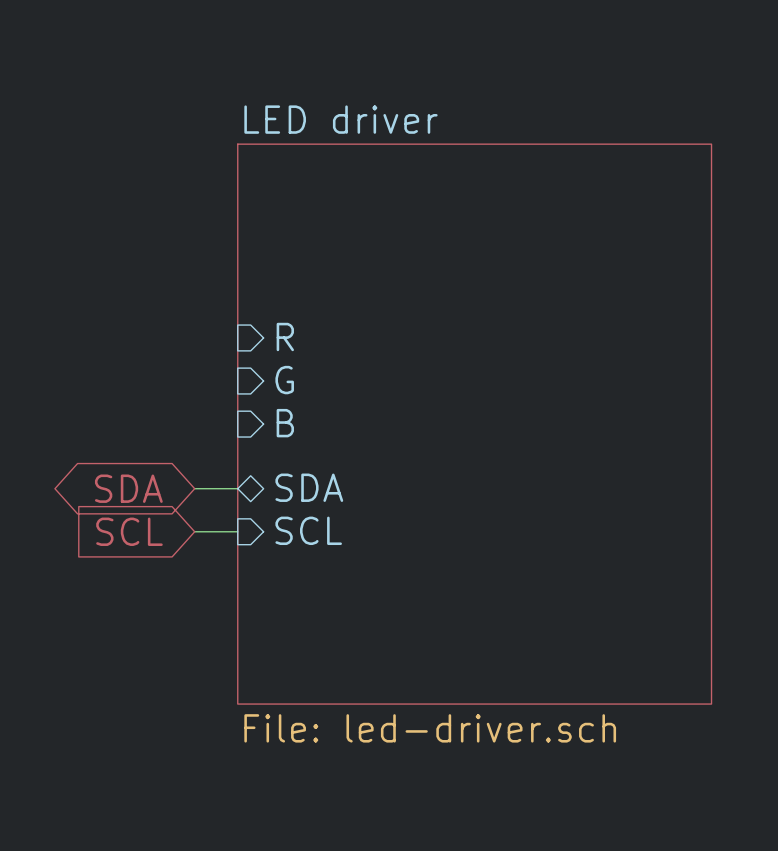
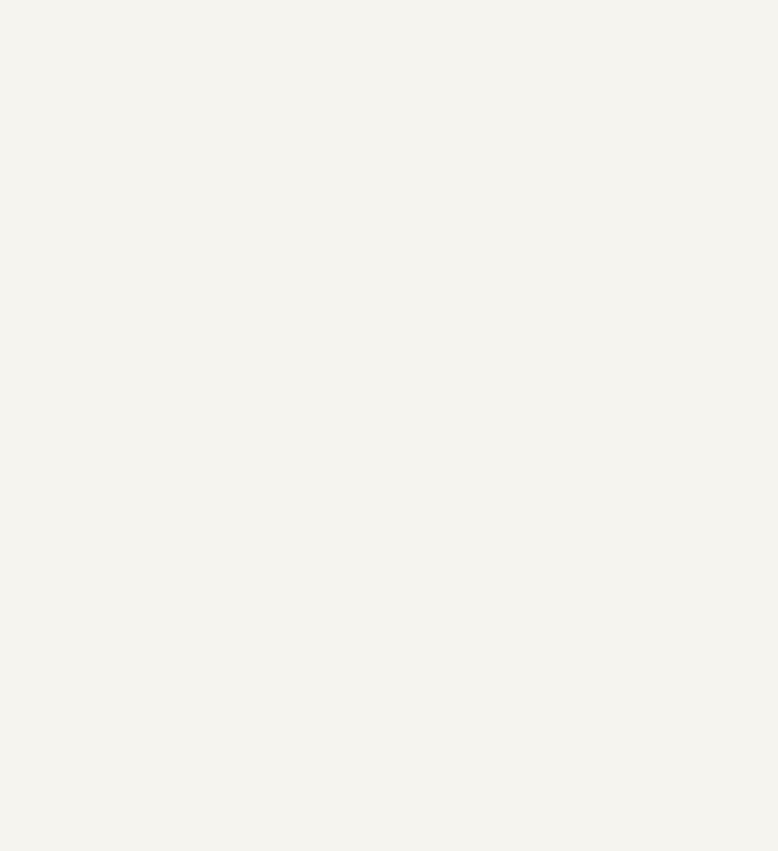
sheet pin: R (285, 336) -> none
sheet pin: G (284, 380) -> none
sheet pin: B (285, 423) -> none
sheet LED driver: File: led-driver.sch (474, 424) -> none
sheet pin: SDA (309, 487) -> none
global label: SDA (128, 488) -> none
wire: (194, 488) (237, 488) -> none
sheet pin: SCL (308, 530) -> none
global label: SCL (129, 531) -> none
wire: (194, 531) (237, 531) -> none

